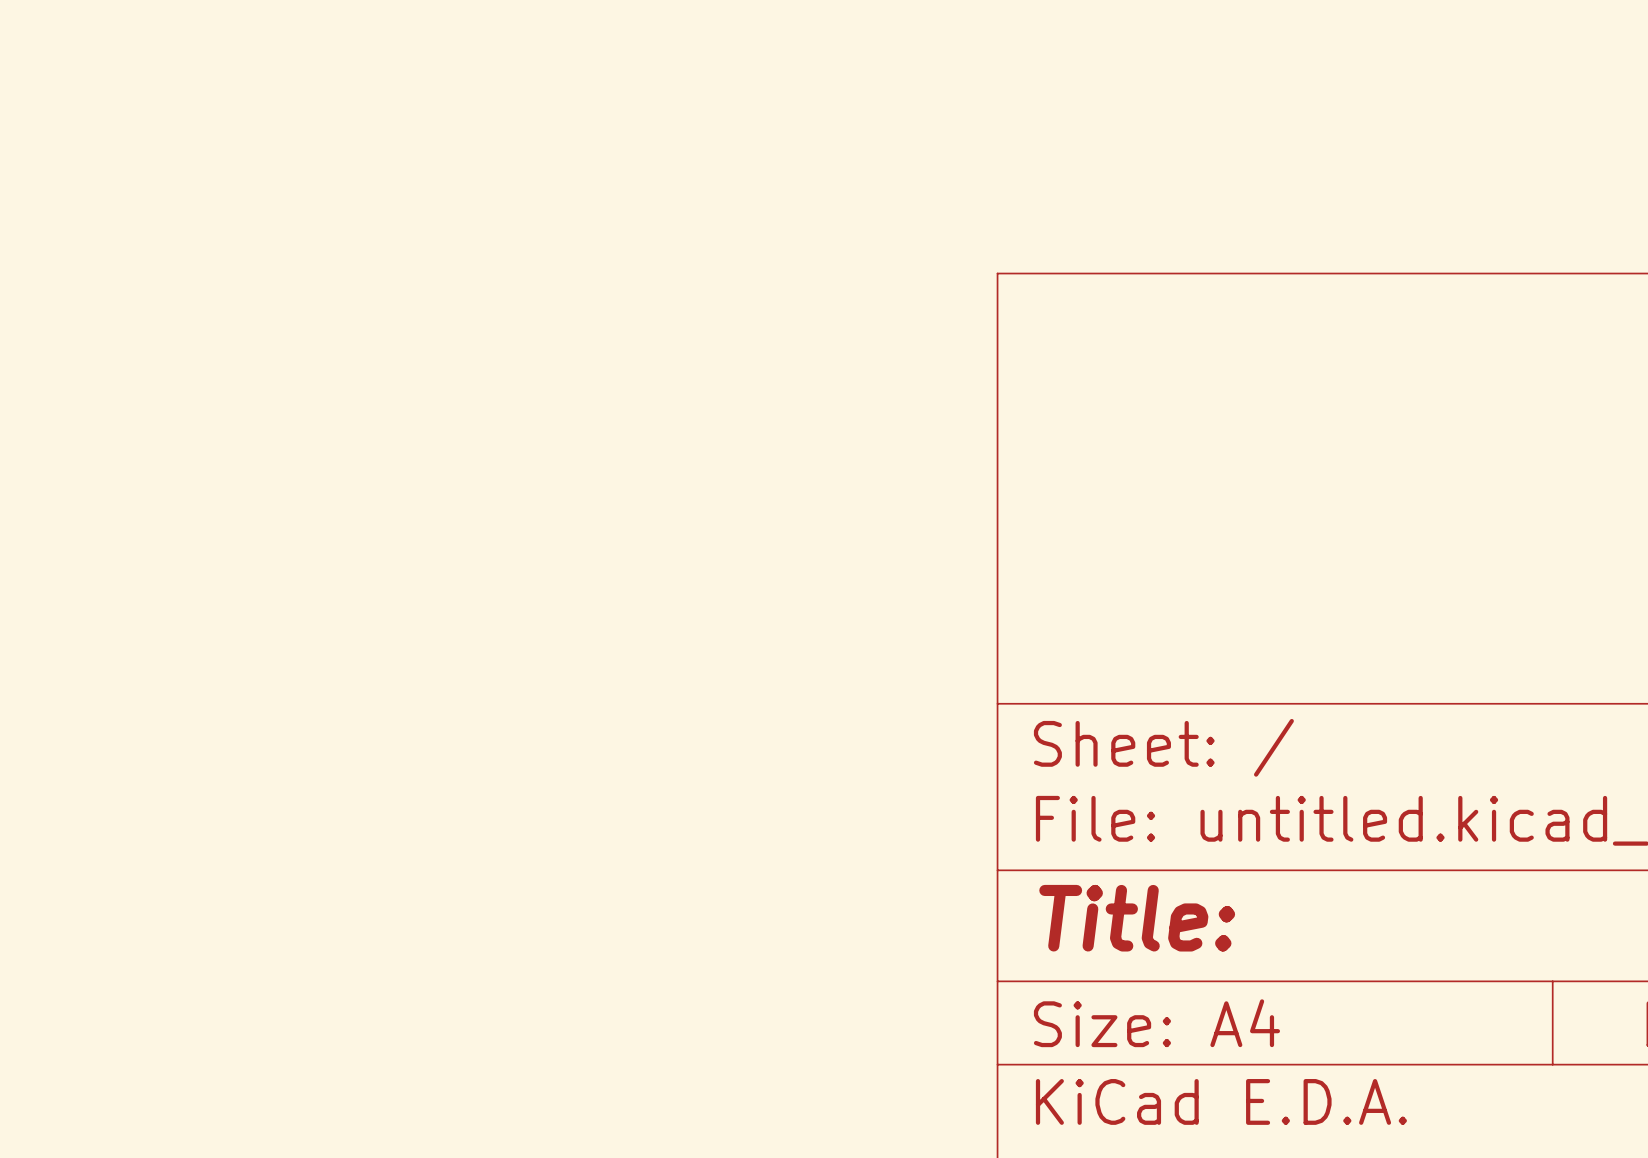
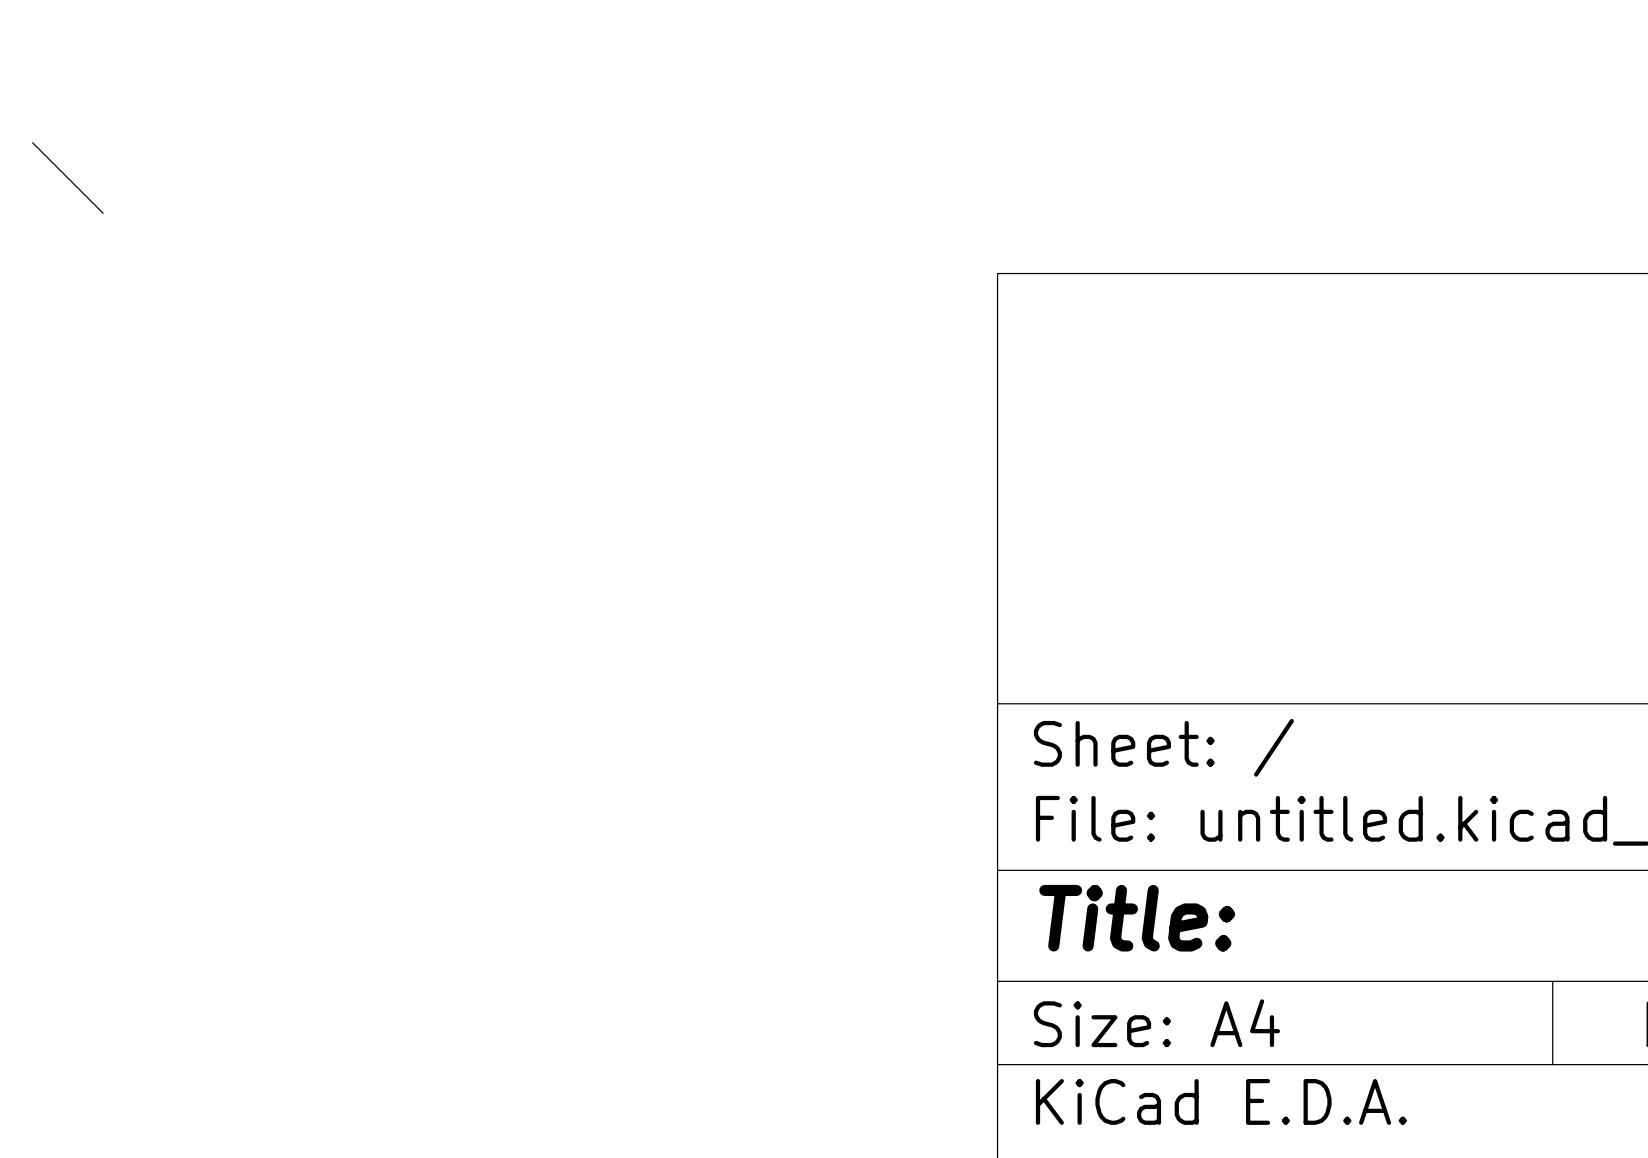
wire: none -> (32, 142) (103, 213)

